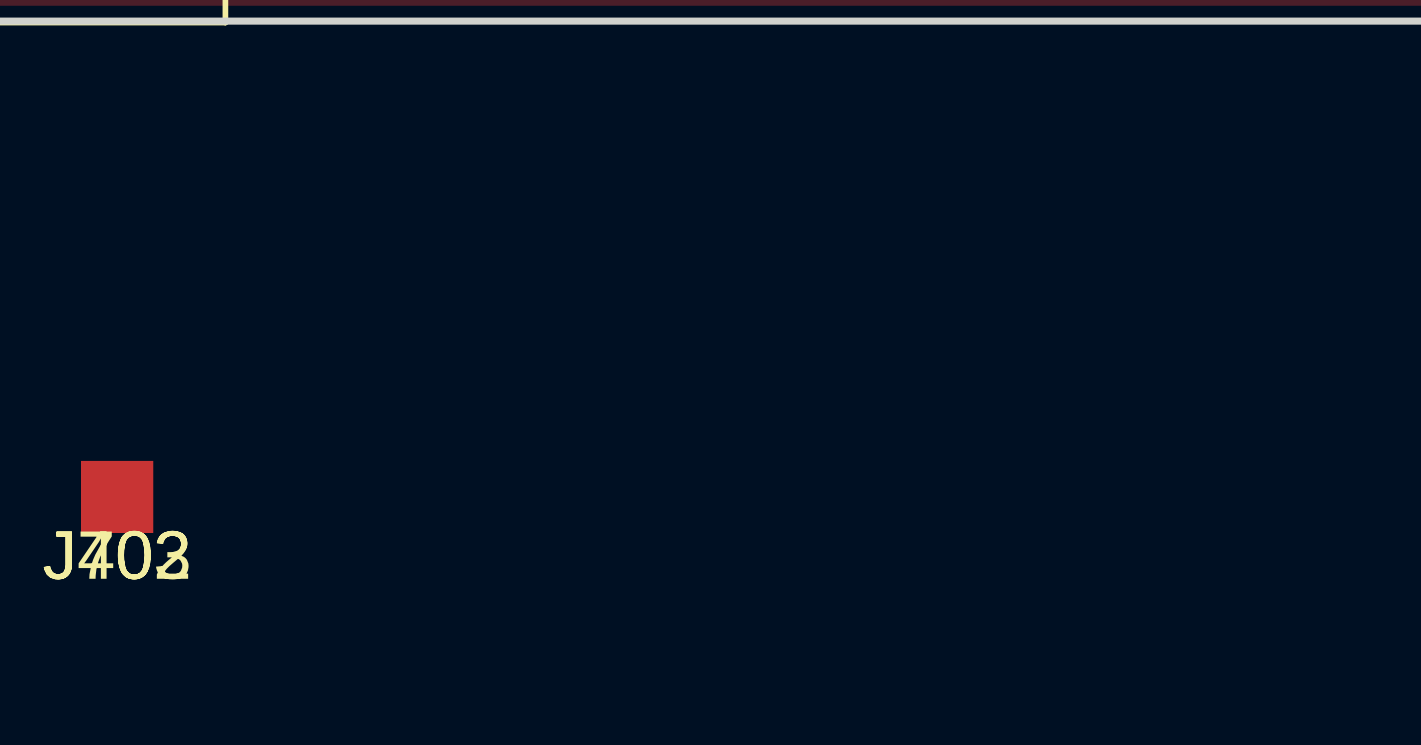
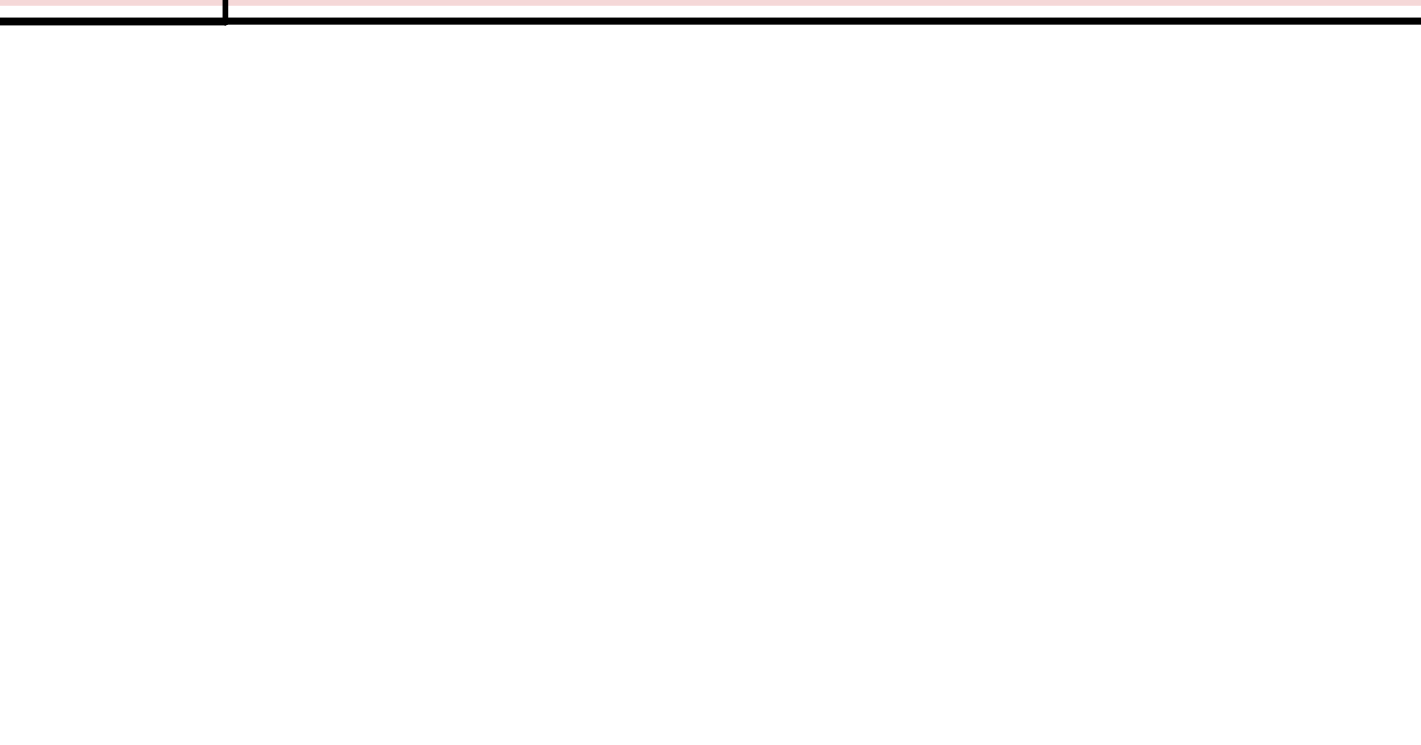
part: (117, 496) -> none
part: (117, 496) -> none

